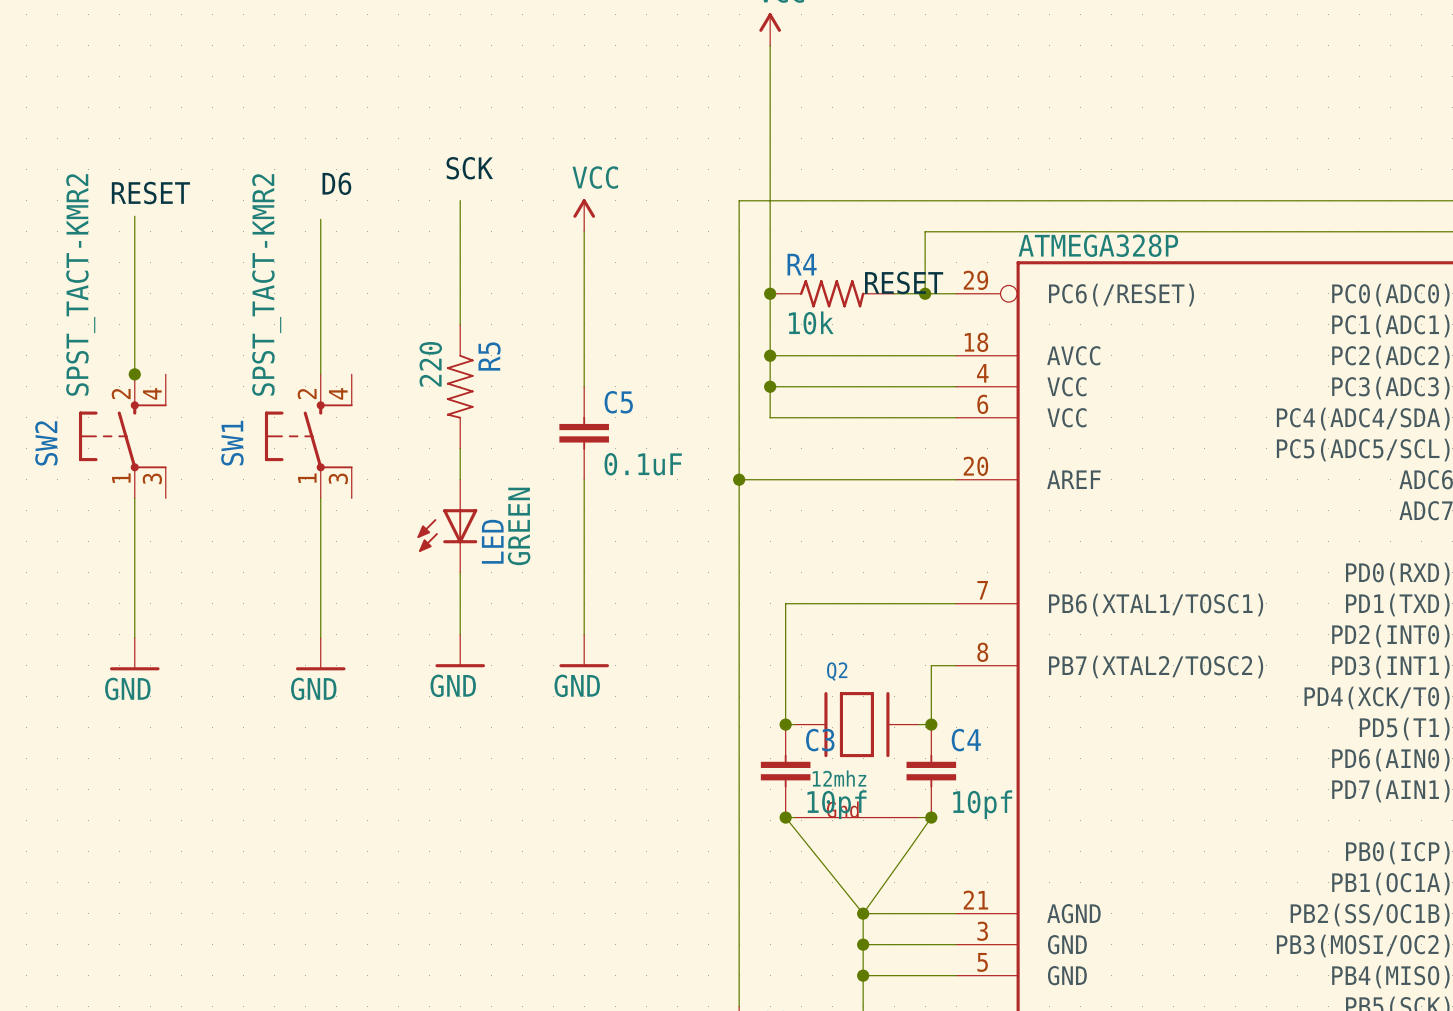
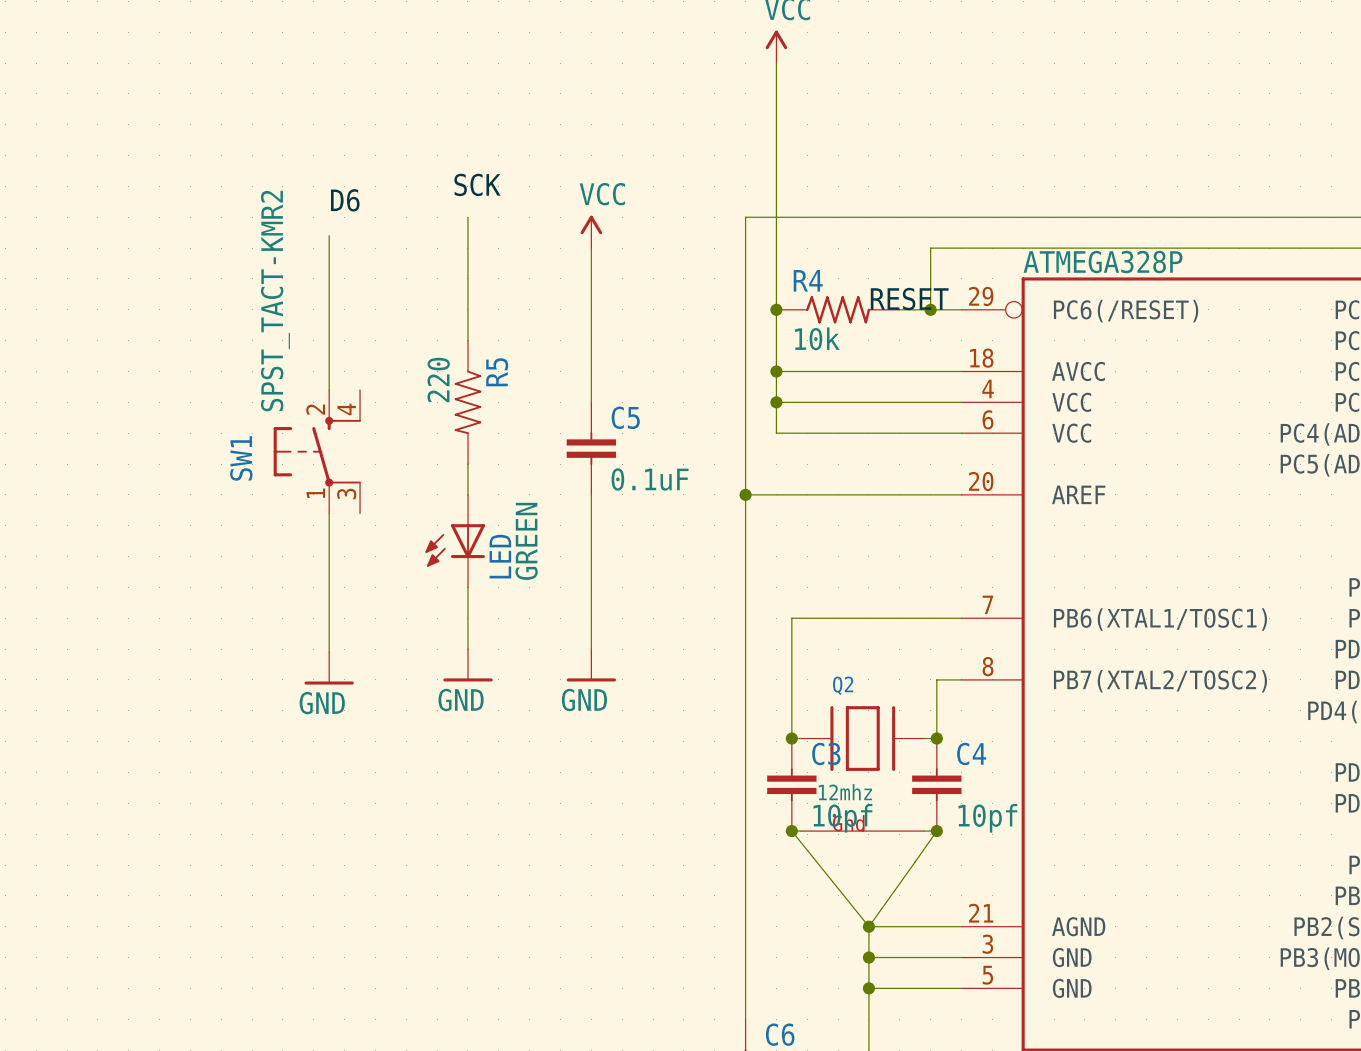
label: RESET (150, 193) -> none
wire: (134, 216) (134, 377) -> none
junction: (134, 374) -> none
SW2: SPST_TACT-KMR2 (122, 436) -> none
wire: (134, 498) (134, 637) -> none
power symbol: GND (134, 654) -> none

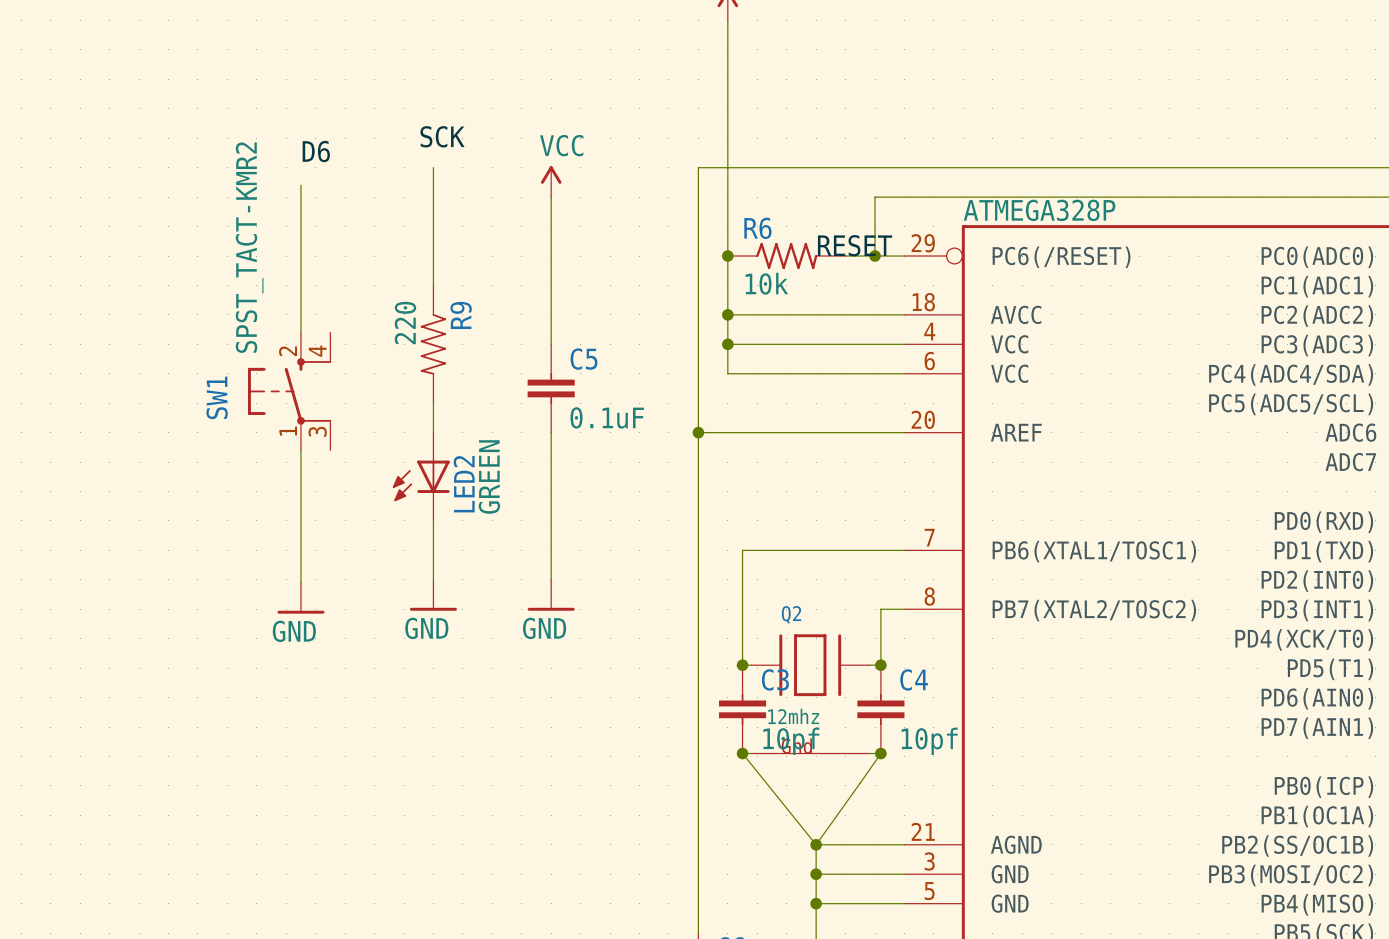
R4 name: R4 (808, 280) -> R6 (757, 228)
R5 name: R5 (497, 372) -> R9 (461, 315)
LED name: LED (500, 556) -> LED2 (464, 484)

